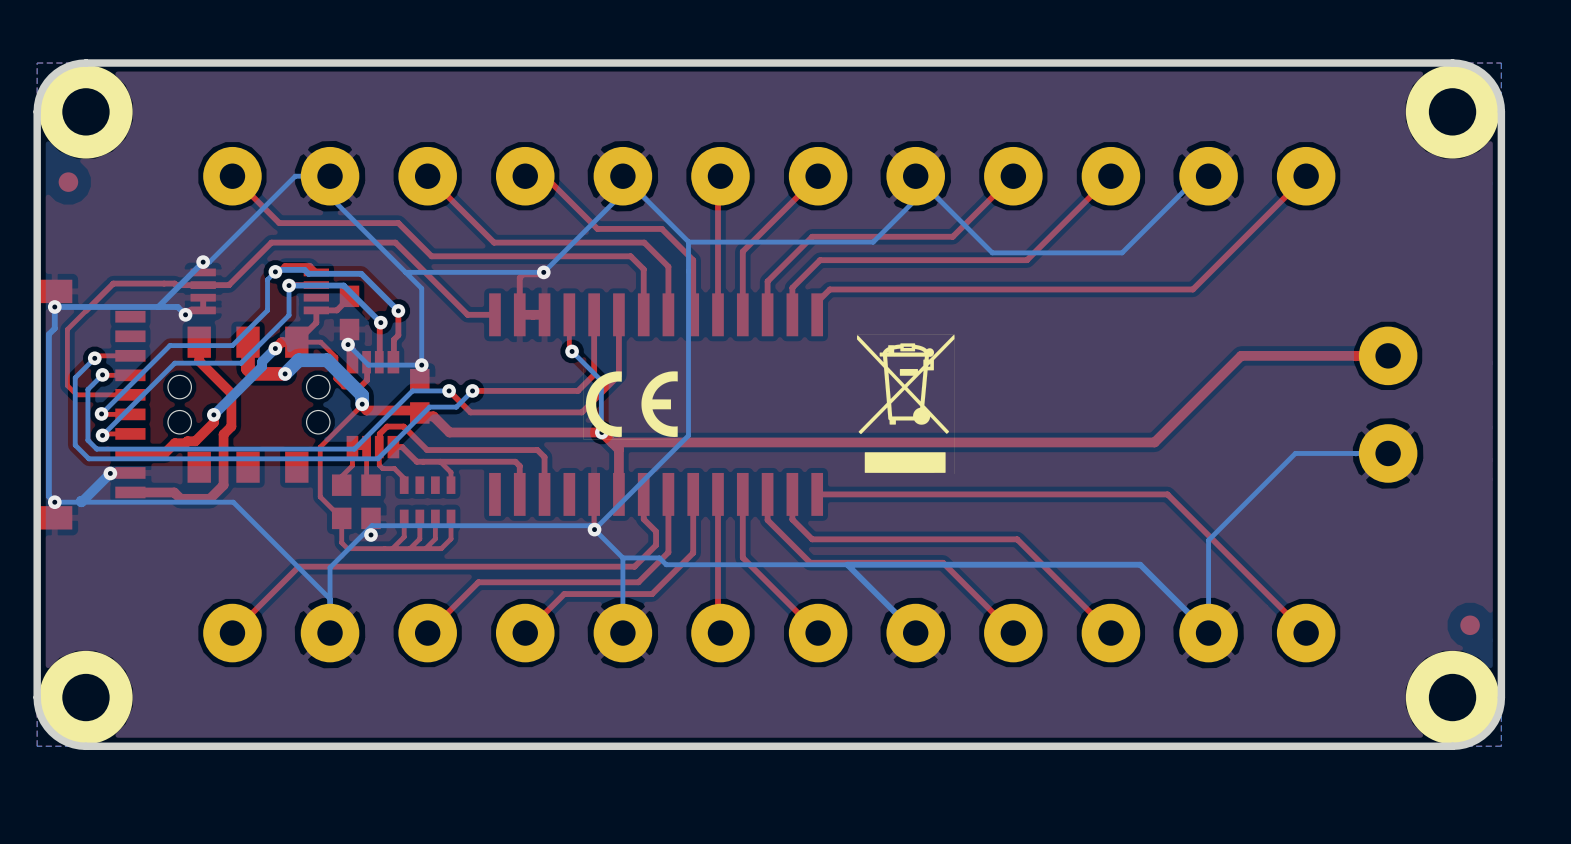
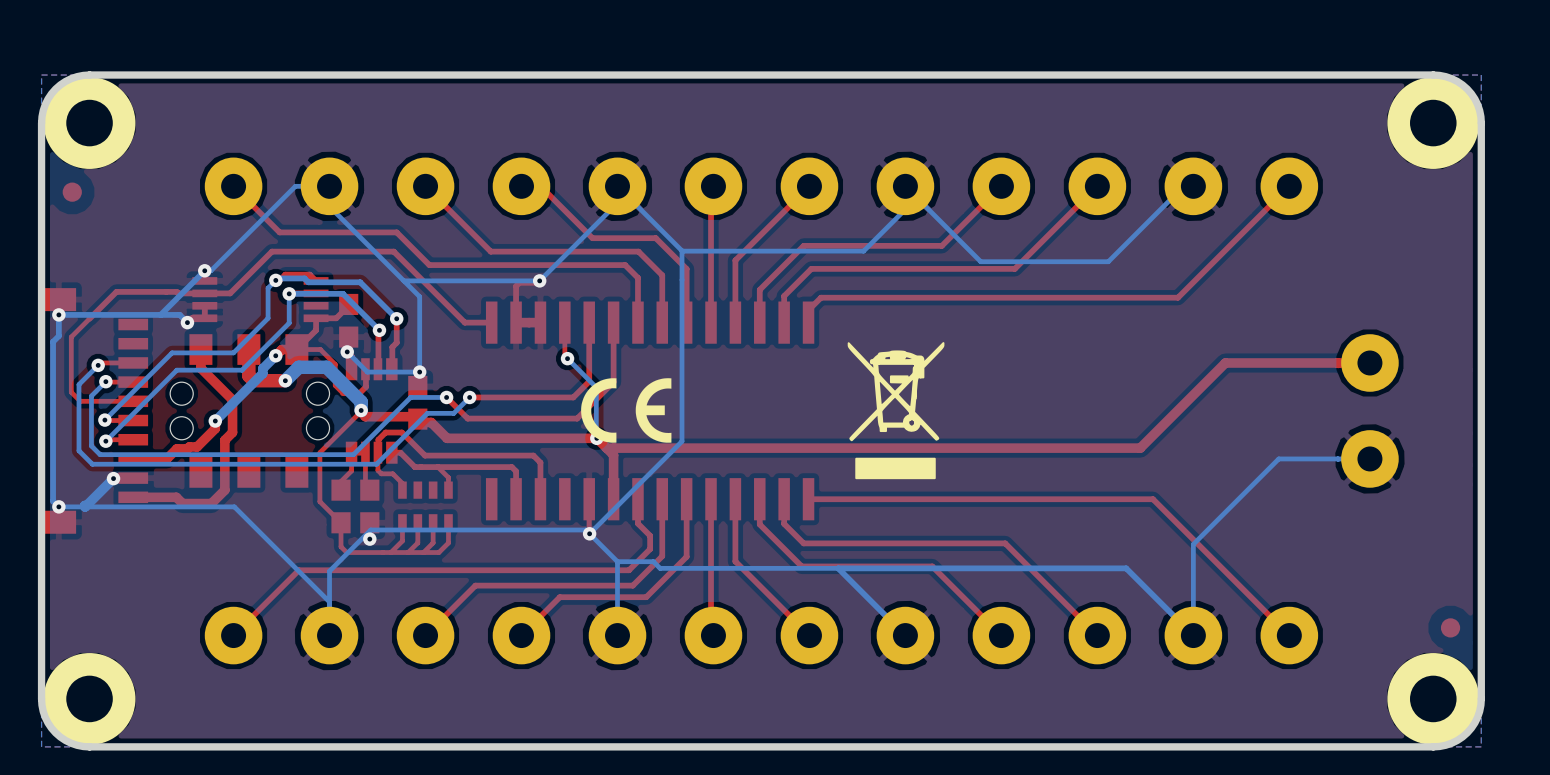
drawing shape: [856, 334, 955, 474] -> [847, 342, 945, 480]
drawing shape: [583, 368, 682, 440] -> [581, 378, 672, 443]

